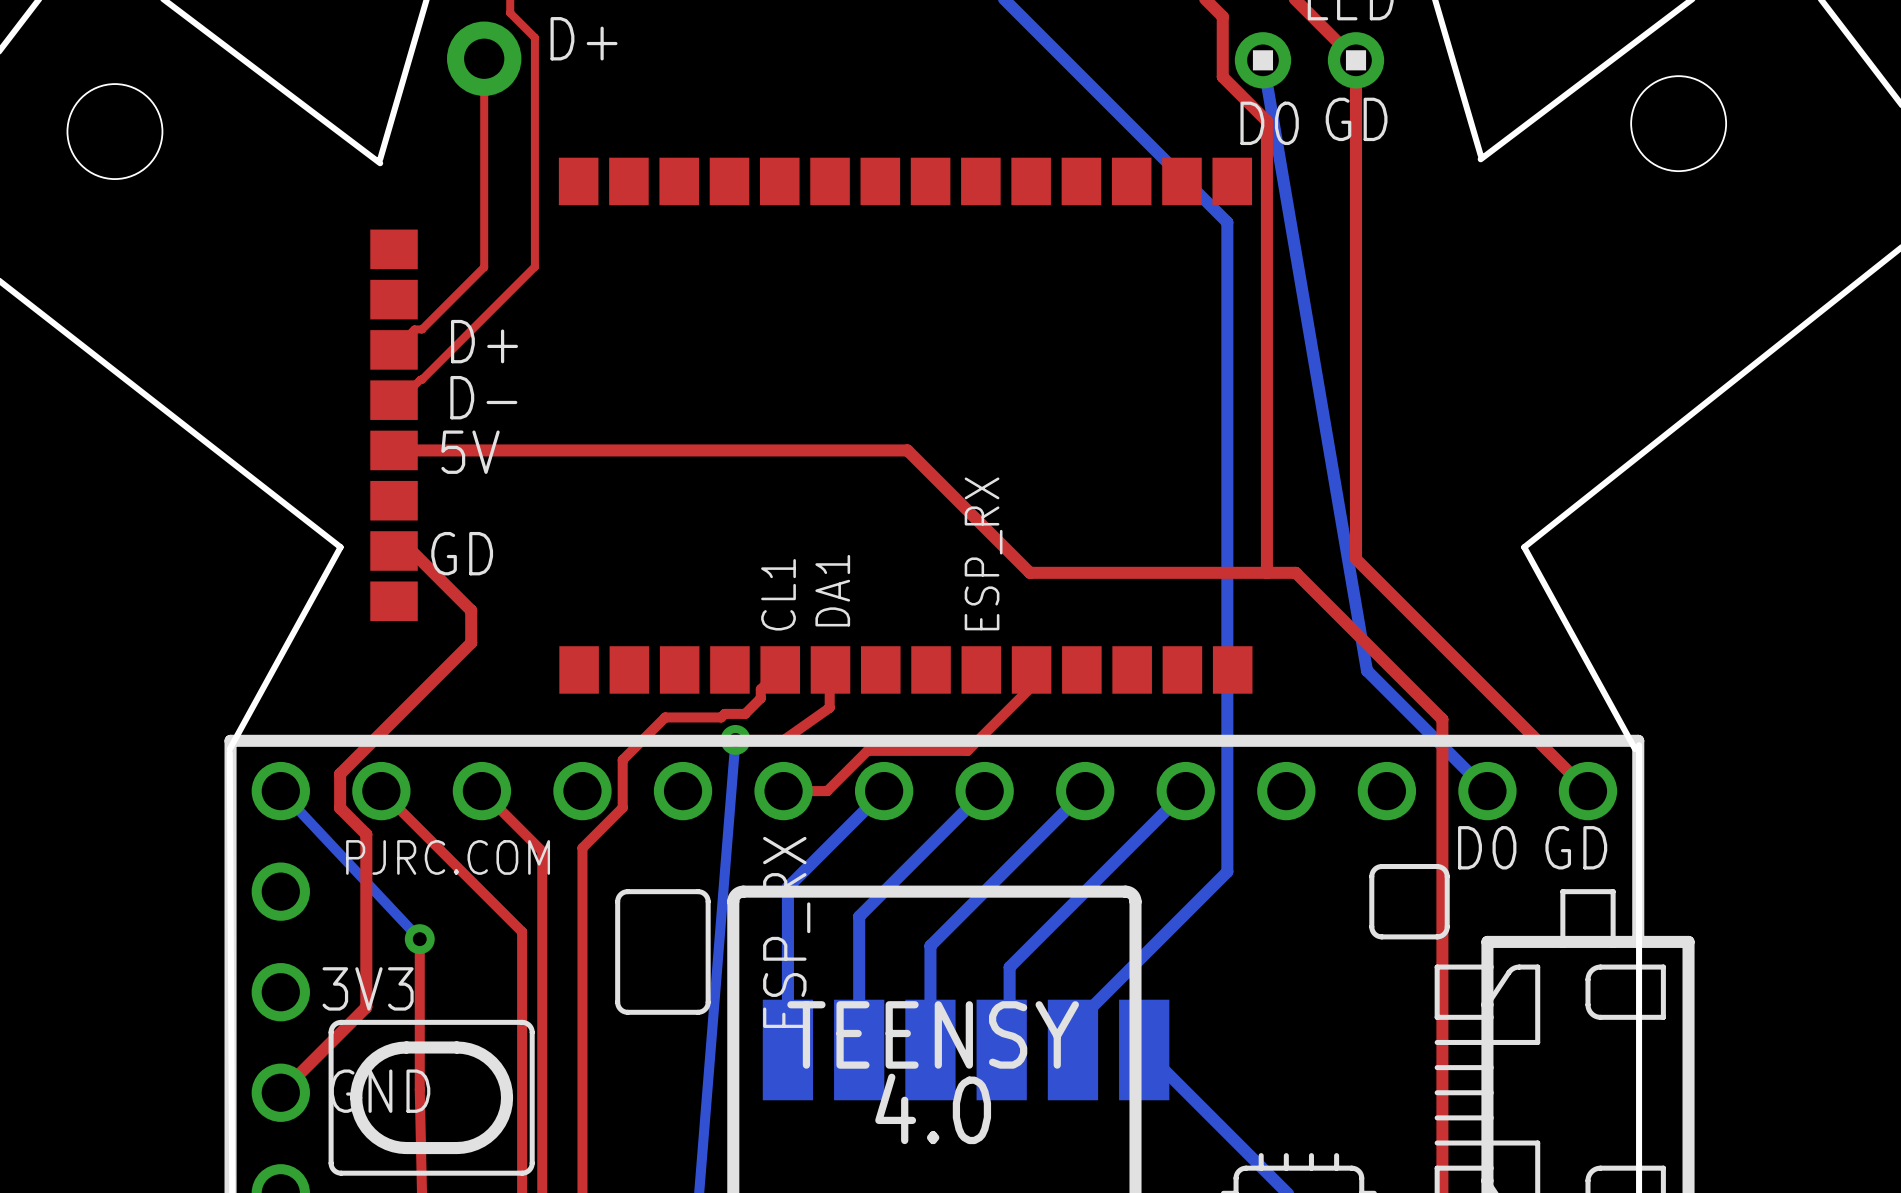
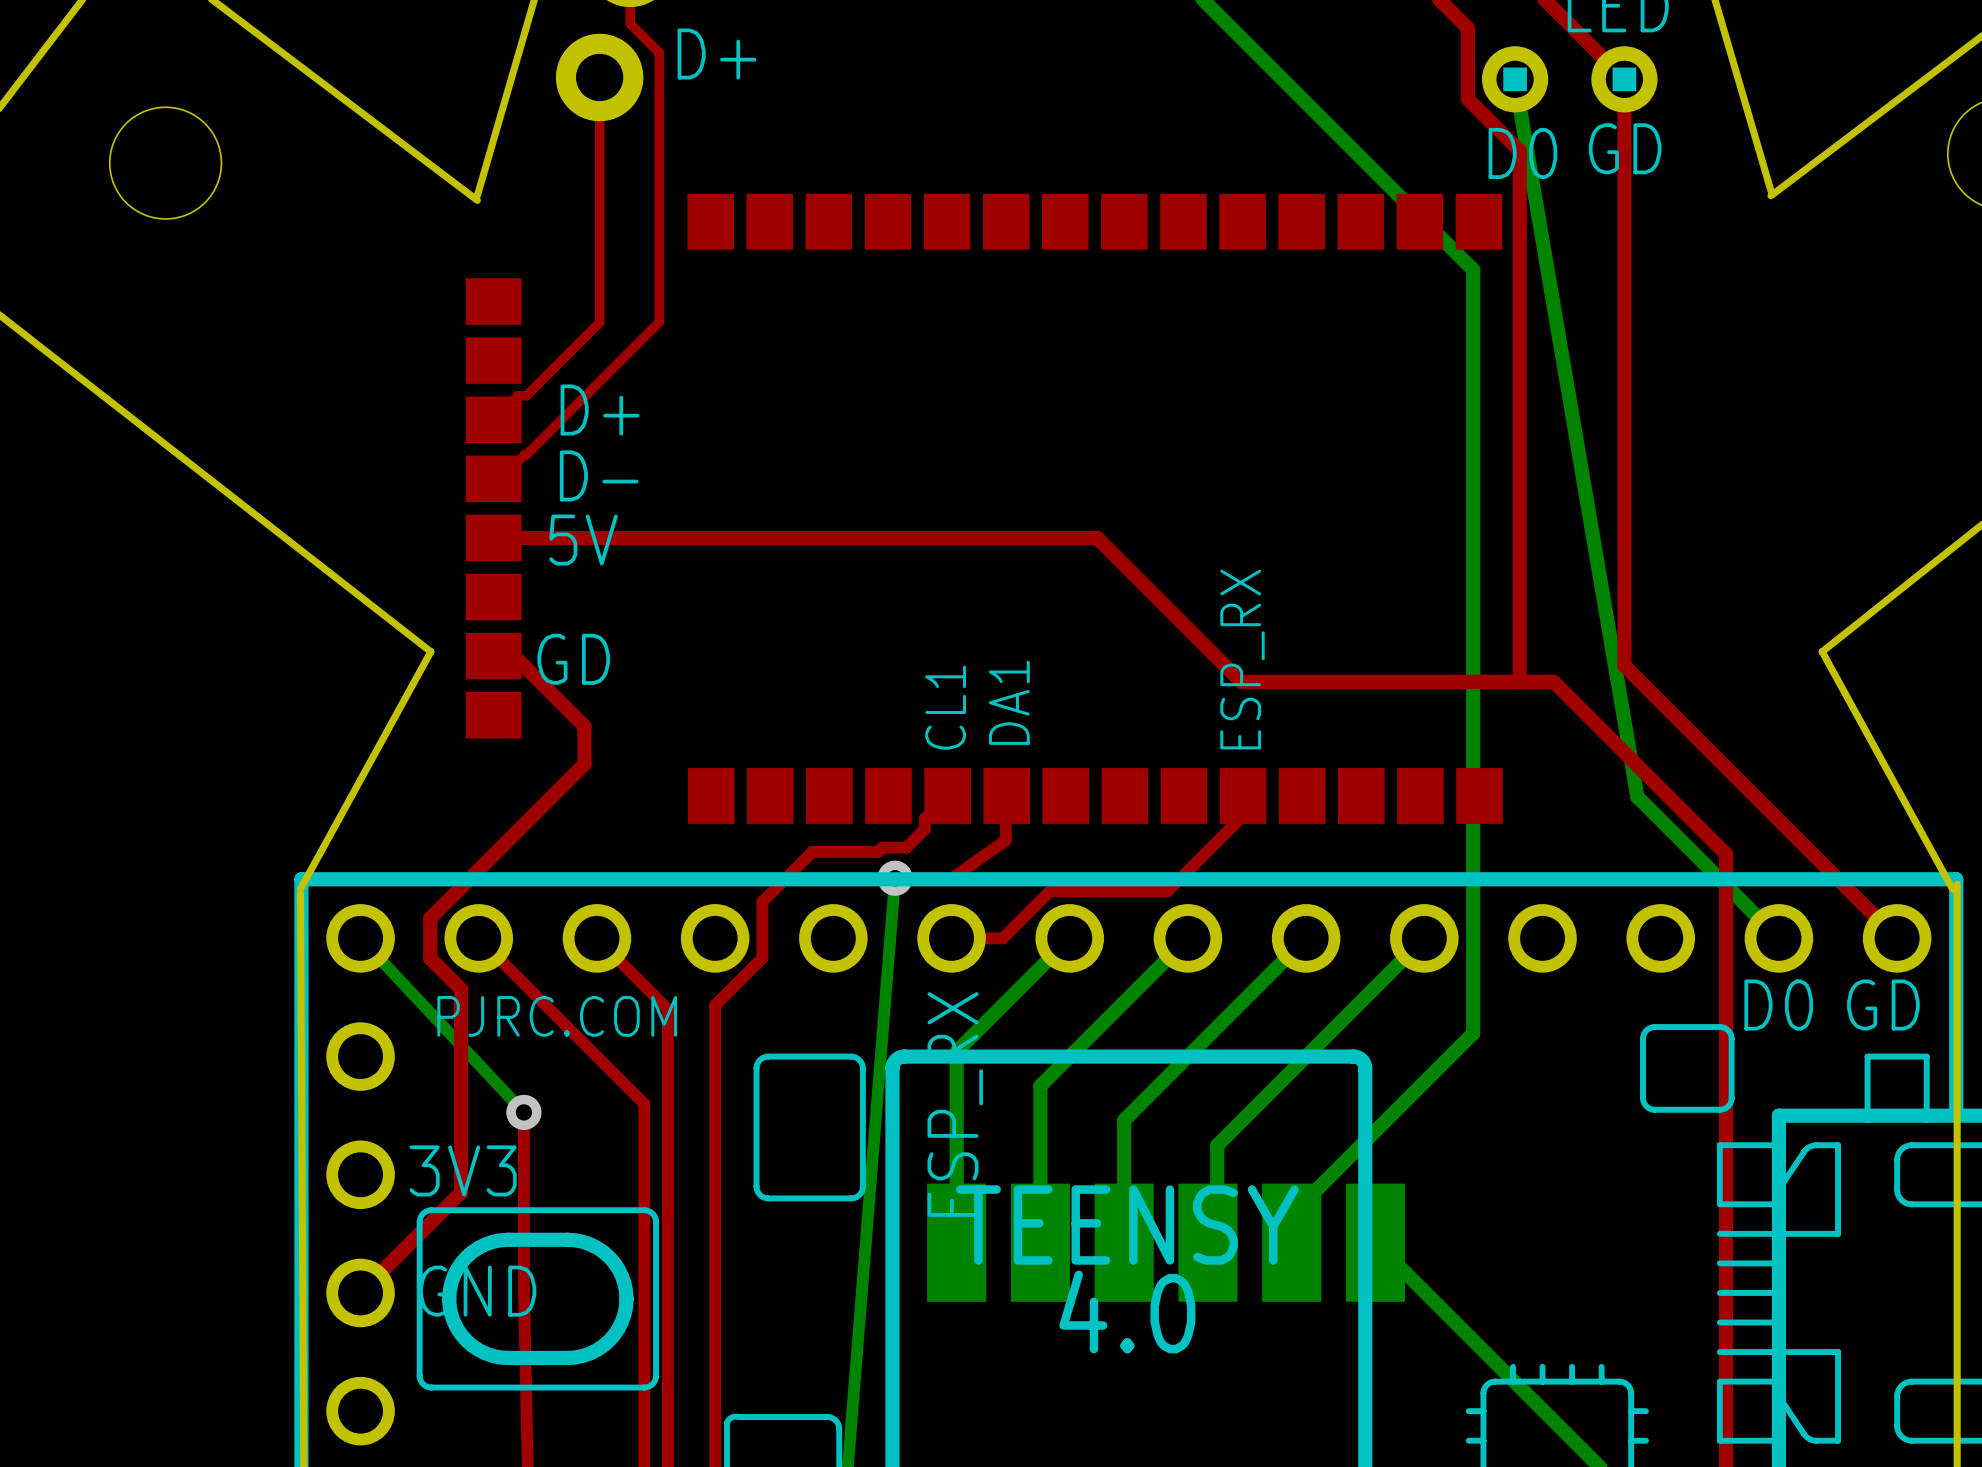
text position: ESP_RX (983, 553) -> ESP_RX (1242, 659)

